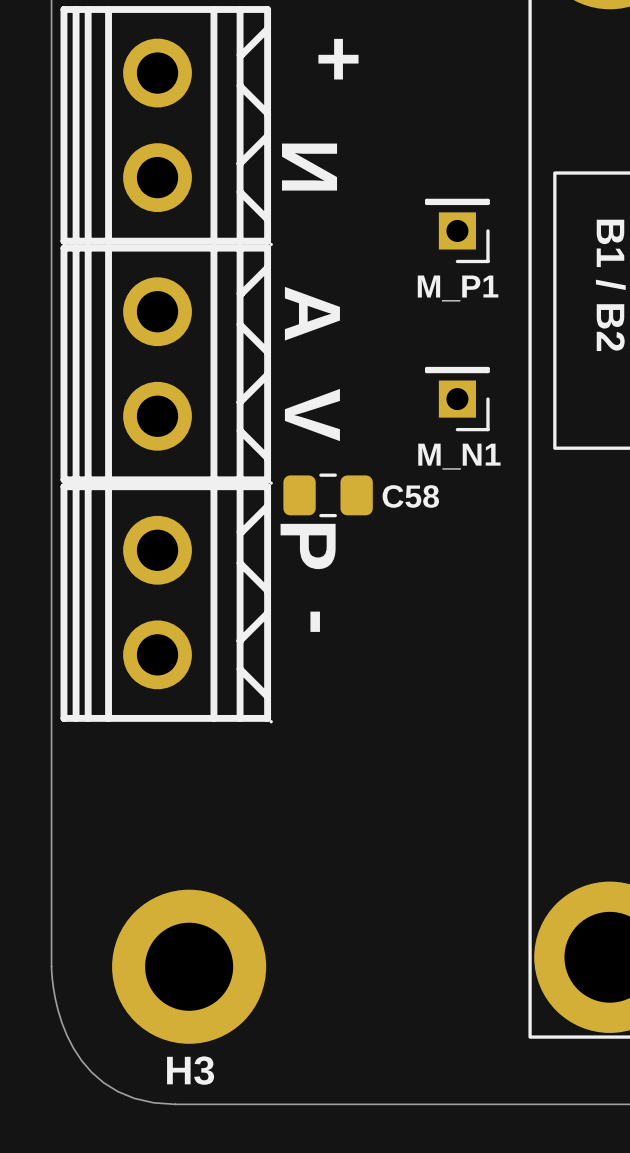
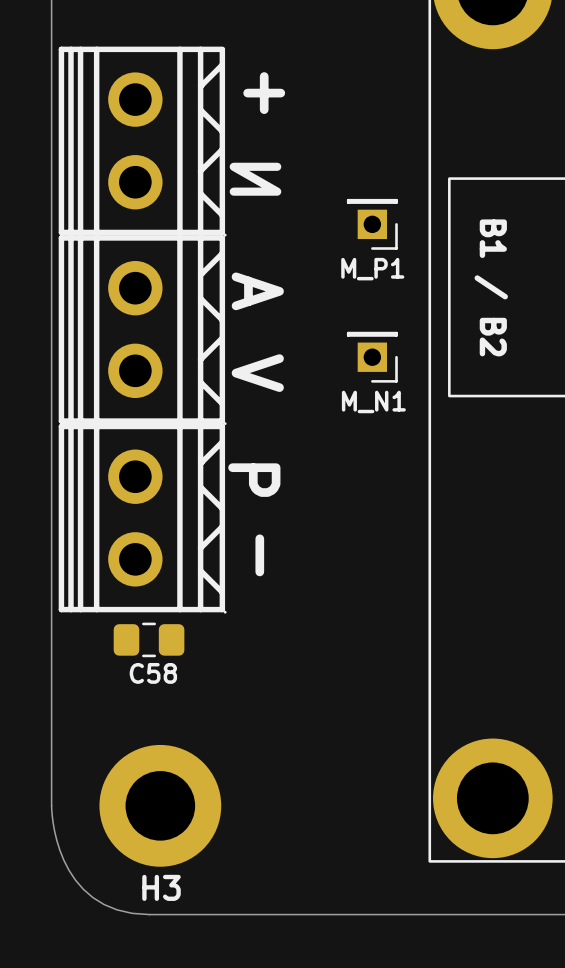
C58 position: (328, 495) -> (149, 639)
C58 name position: C58 (410, 496) -> C58 (153, 673)

